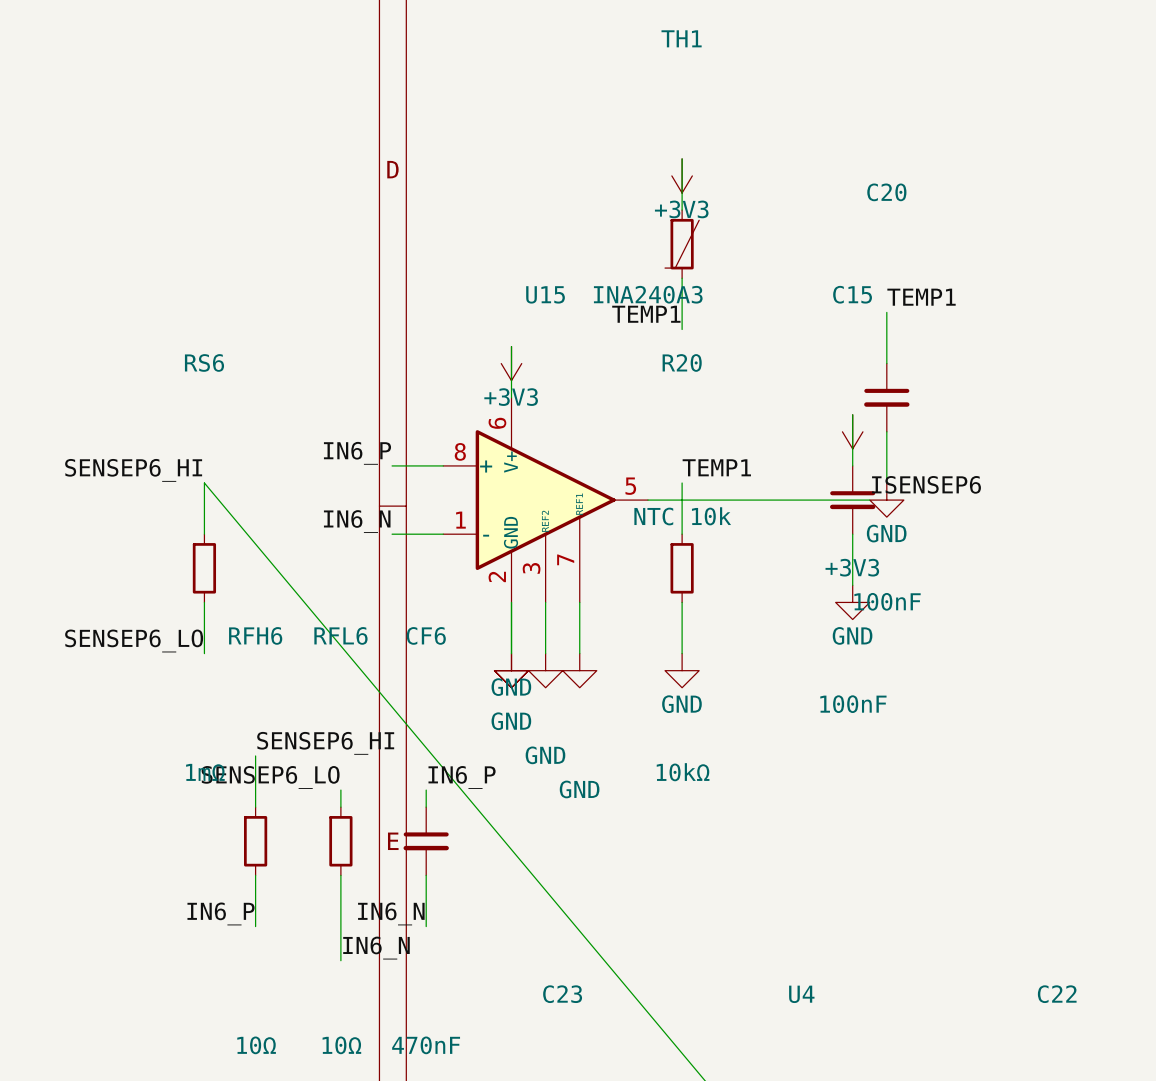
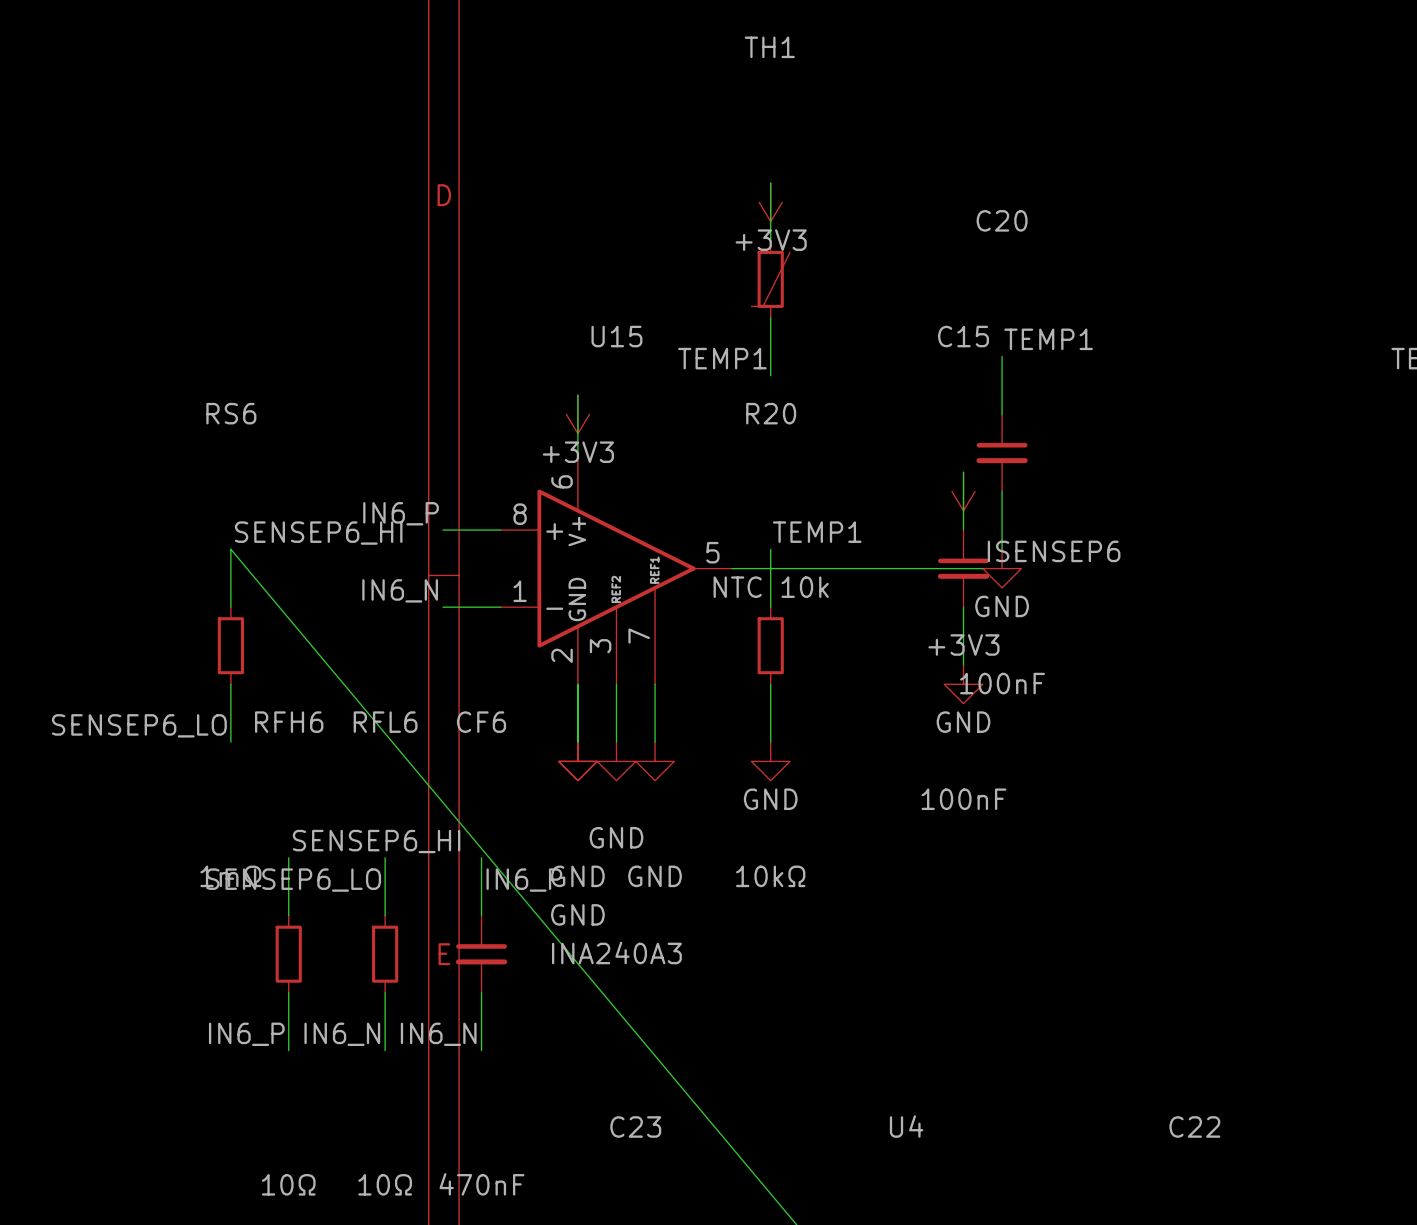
U15 value position: INA240A3 (648, 294) -> INA240A3 (616, 953)
label position: SENSEP6_HI (133, 470) -> SENSEP6_HI (318, 533)
power symbol: GND (511, 670) -> none
power symbol: GND (511, 670) -> none
power symbol: none -> GND (577, 761)
power symbol: none -> GND (577, 761)
wire: none -> (481, 857) (481, 896)
power symbol text position: GND (545, 755) -> GND (616, 837)
power symbol text position: GND (579, 789) -> GND (655, 876)
wire: (340, 926) (340, 960) -> (385, 857) (385, 896)
label position: IN6_N (376, 948) -> IN6_N (342, 1034)

